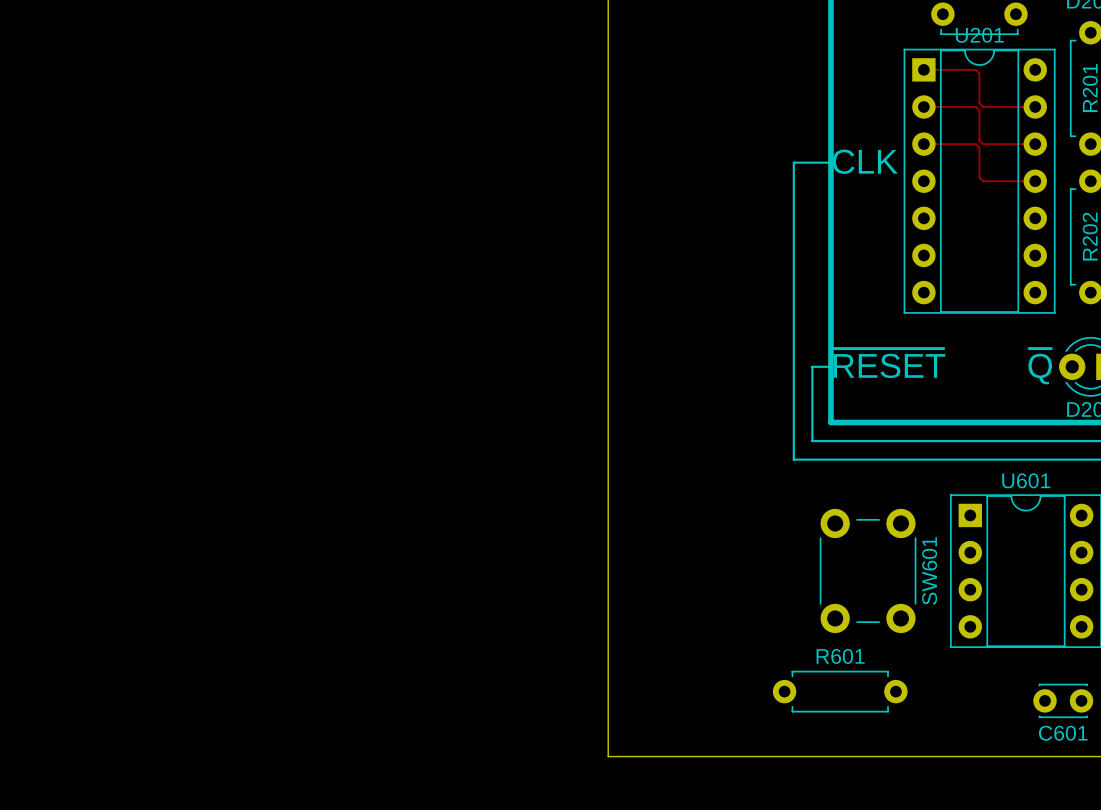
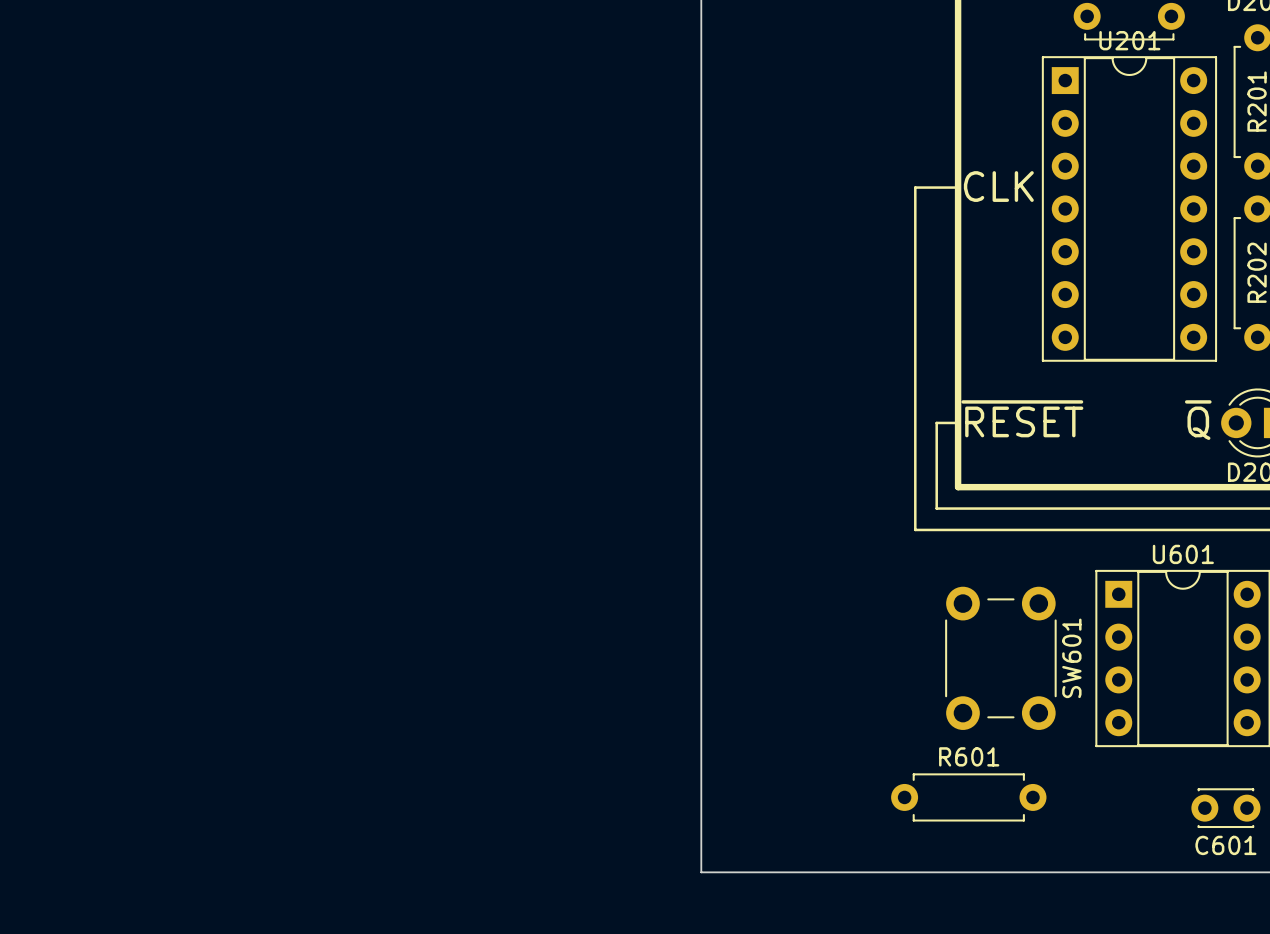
track: (923, 69) (975, 69) (979, 73) (979, 103) (983, 106) (1035, 106) -> none
track: (923, 106) (975, 106) (979, 110) (979, 140) (983, 144) (1035, 144) -> none
track: (923, 144) (975, 144) (979, 147) (979, 177) (983, 181) (1035, 181) -> none

